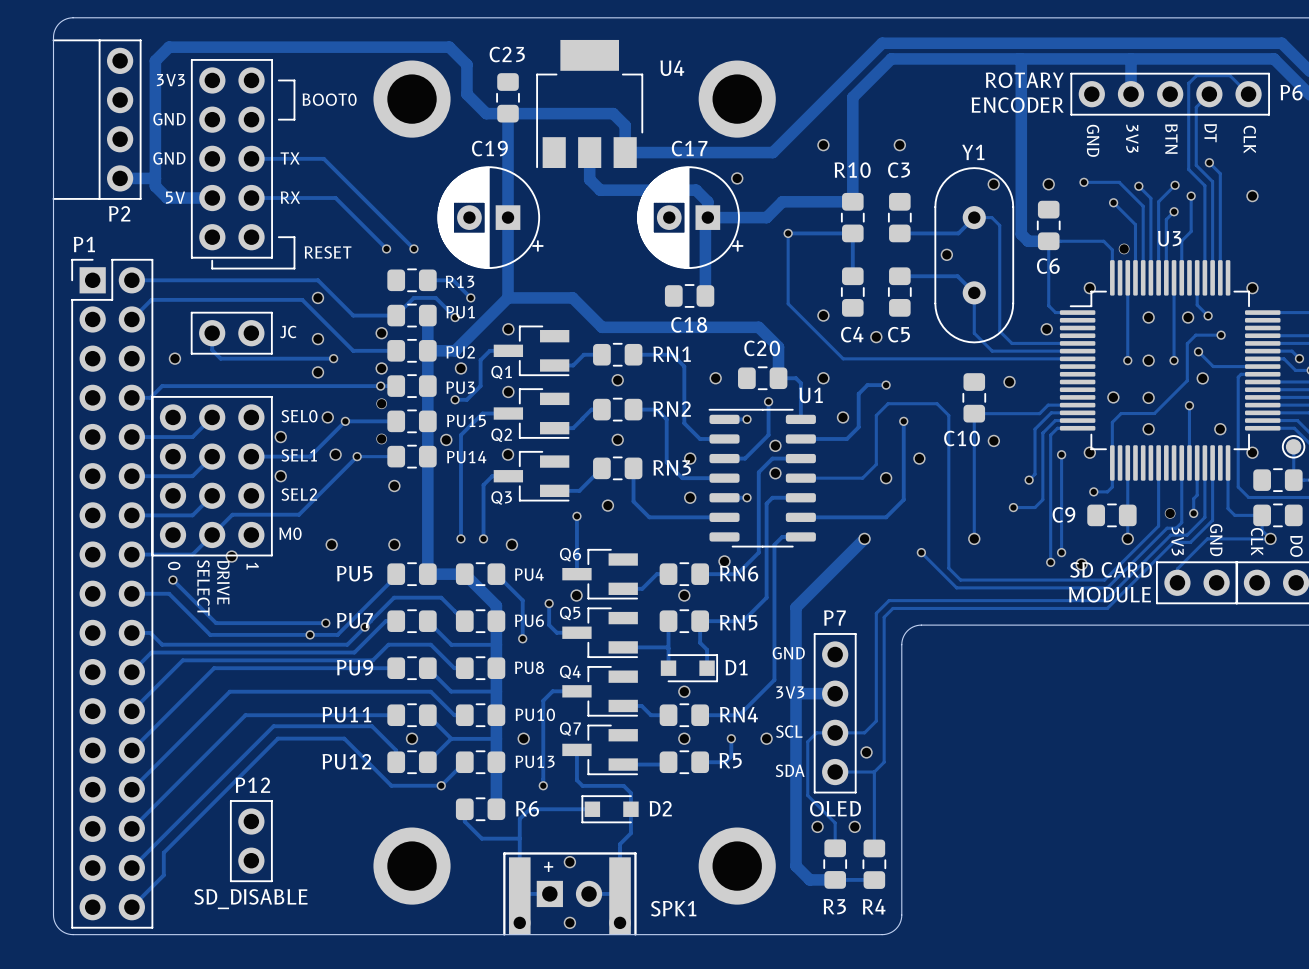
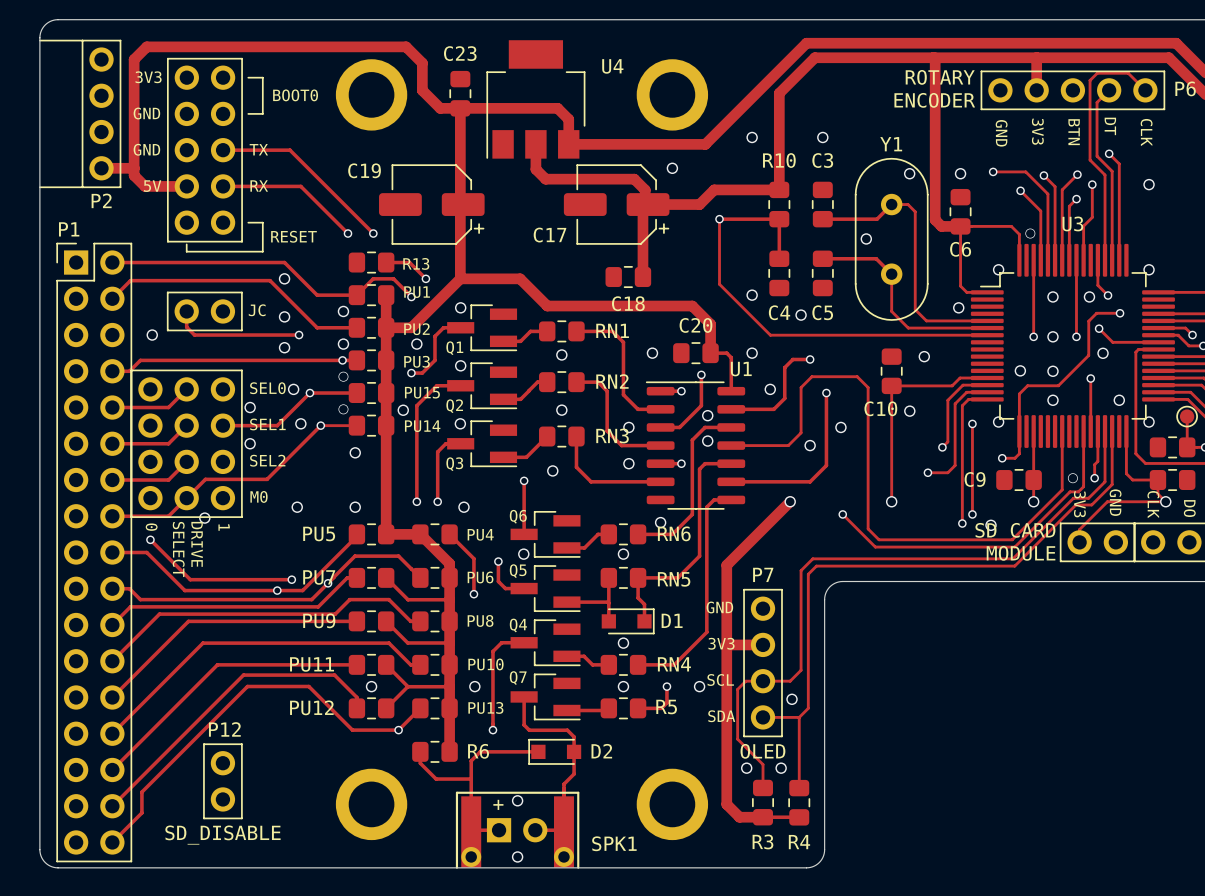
C19 name position: C19 (489, 148) -> C19 (364, 170)
C17 name position: C17 (689, 148) -> C17 (549, 235)
C19 footprint: [437, 166, 544, 269] -> [379, 164, 485, 245]
C17 footprint: [637, 166, 744, 269] -> [563, 164, 670, 245]

